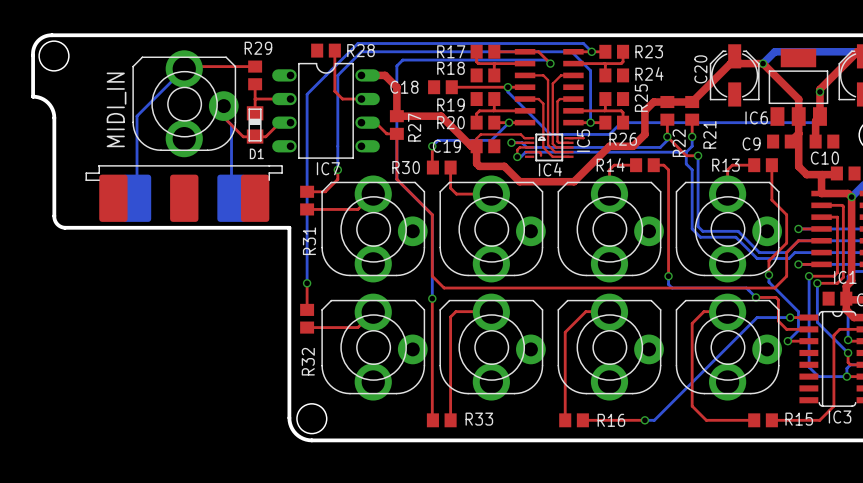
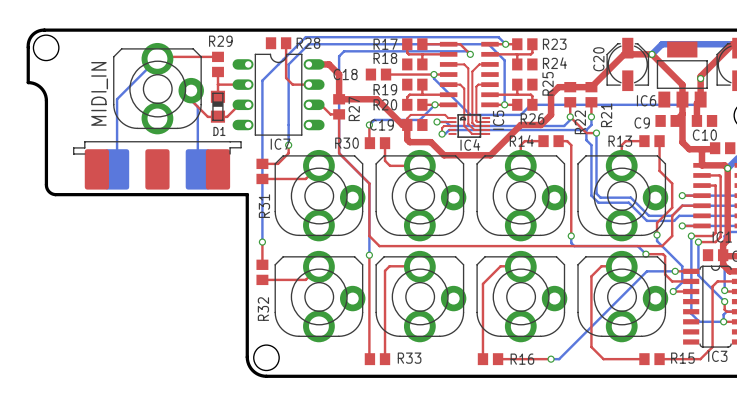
top track: (583, 138) (568, 138) -> none
top track: (529, 152) (539, 152) (540, 155) -> none

